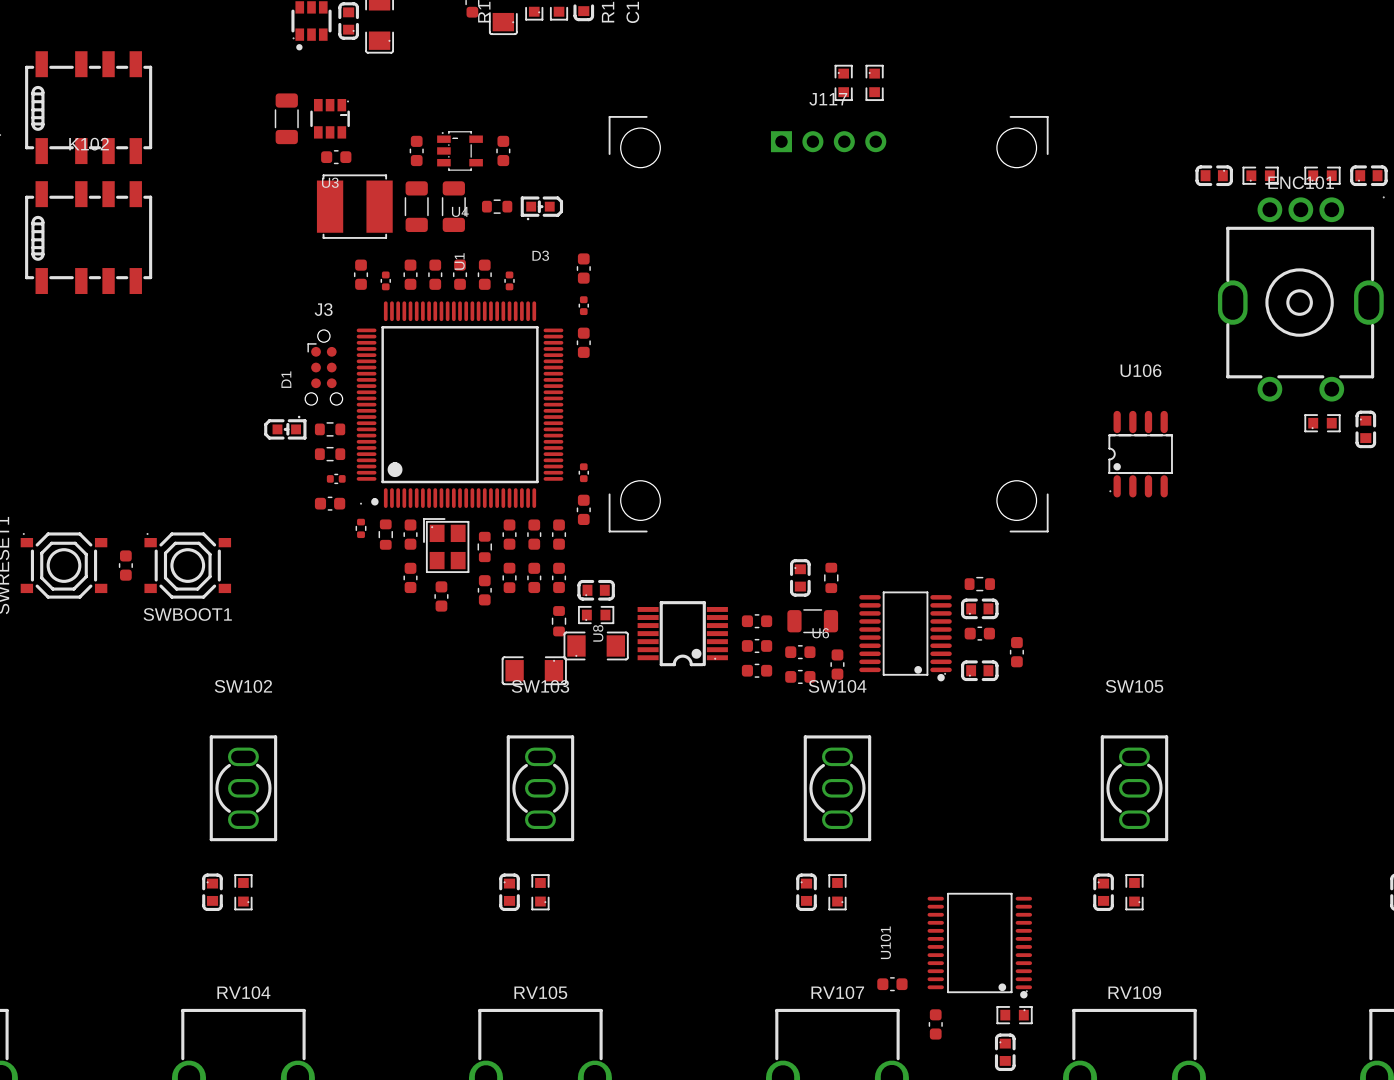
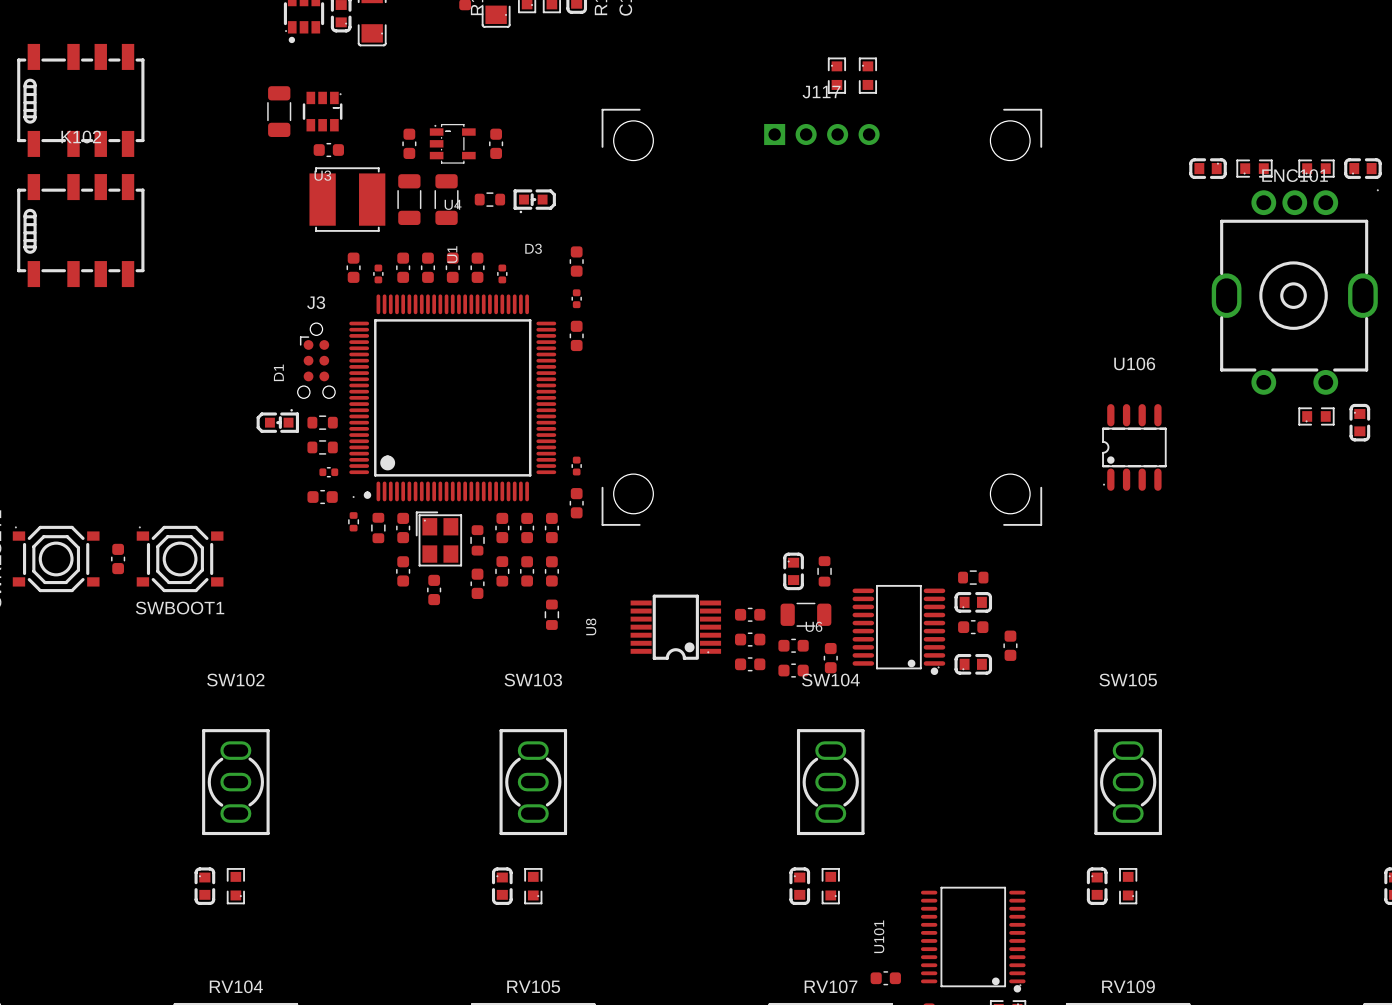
part: (596, 590) -> none
part: (596, 615) -> none
part: (596, 645) -> none
part: (534, 670) -> none

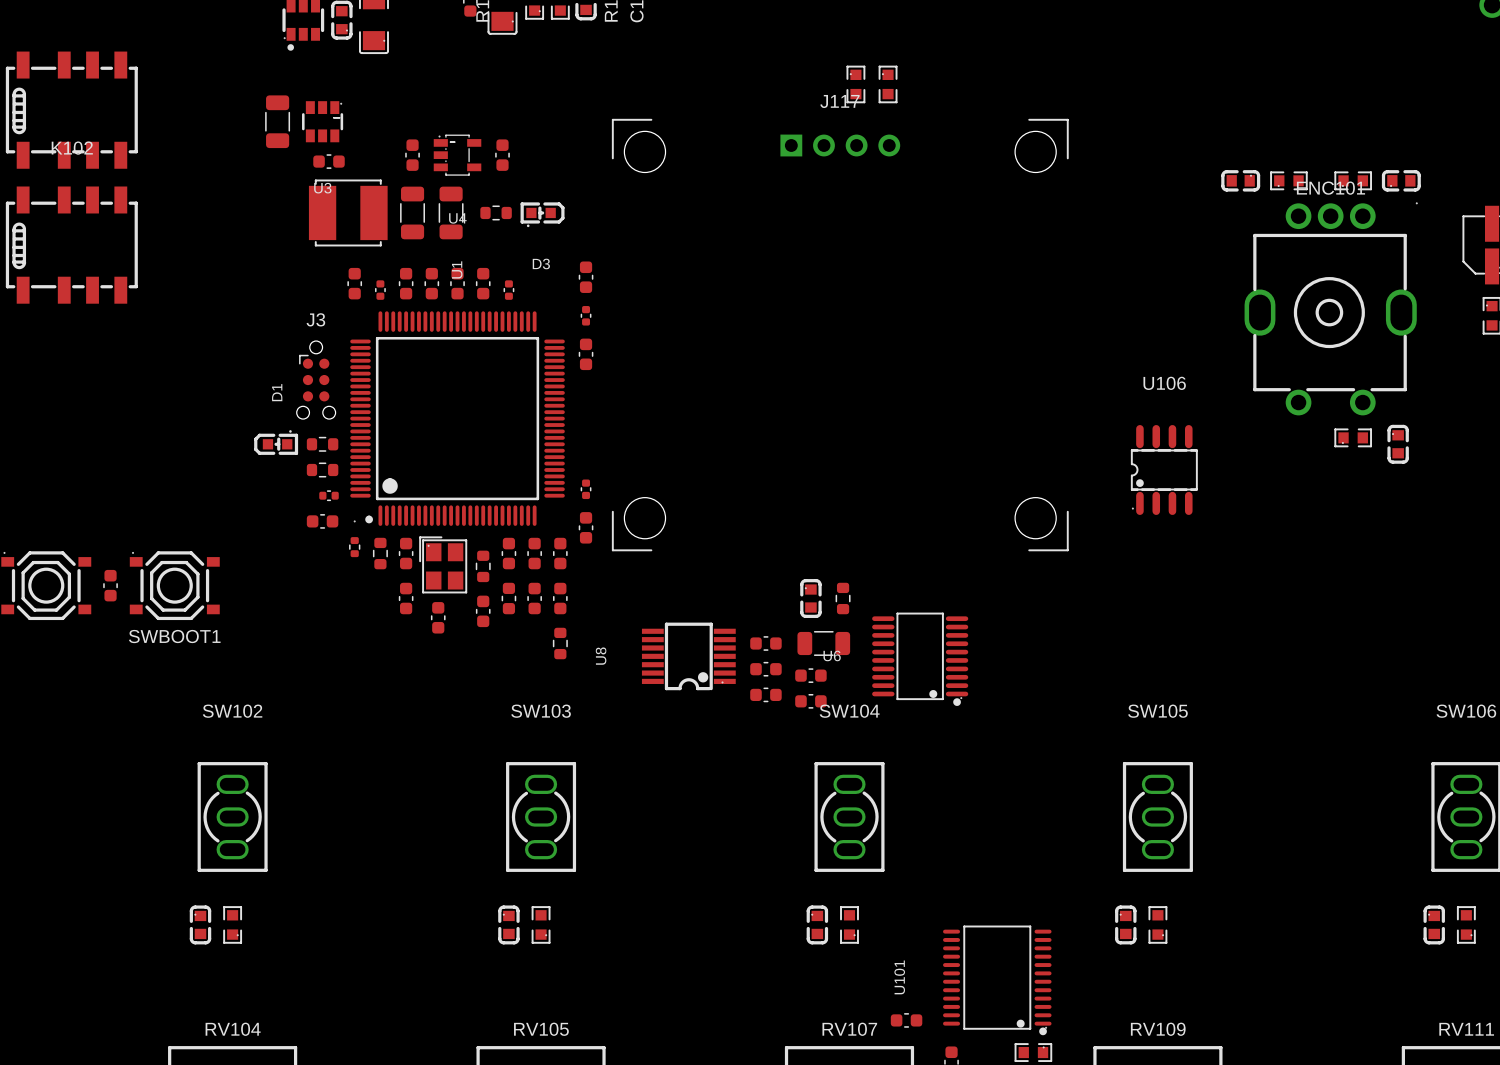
part: (973, 577) -> none
part: (973, 602) -> none
part: (973, 627) -> none
part: (1010, 645) -> none
part: (830, 658) -> none
part: (973, 664) -> none

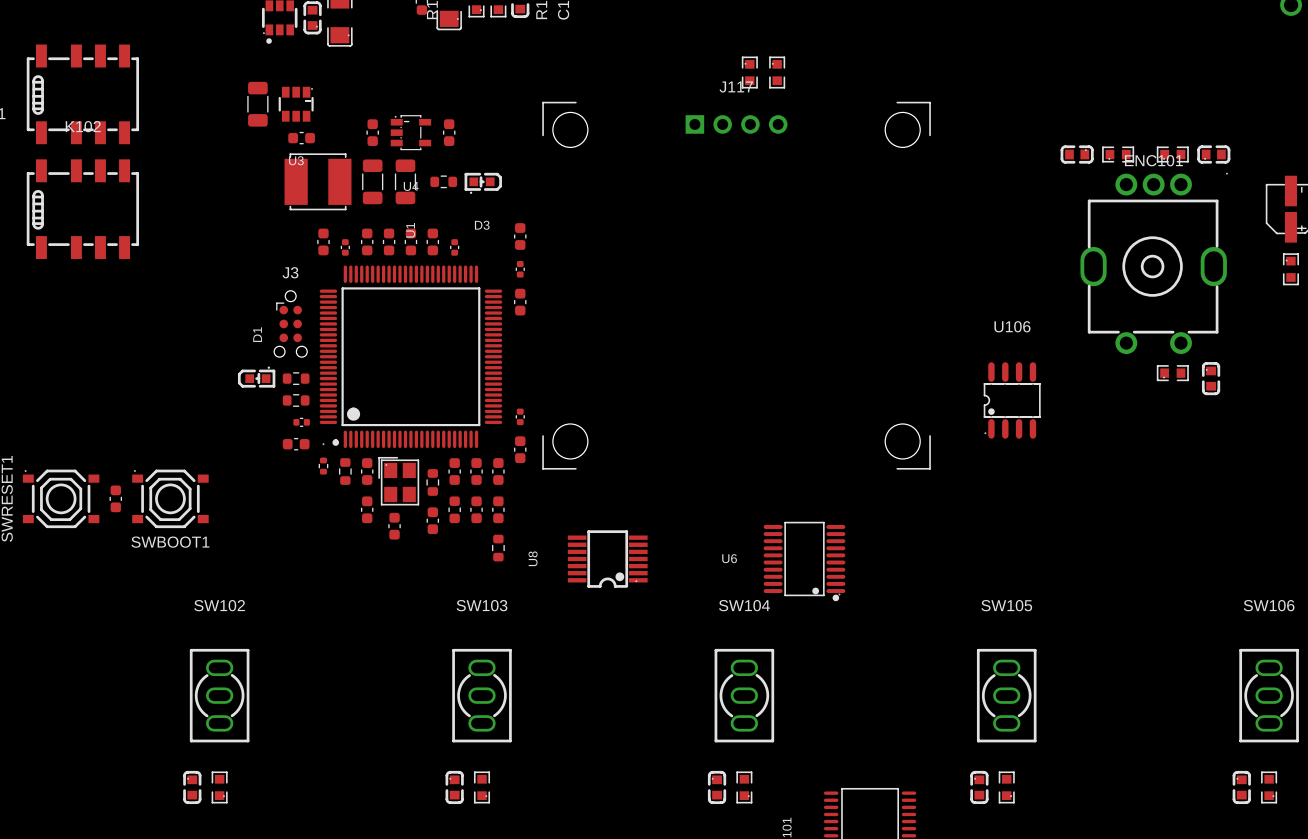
part: (810, 598) -> none
part: (843, 598) -> none
part: (765, 643) -> none
part: (823, 643) -> none
part: (765, 669) -> none
part: (810, 675) -> none
part: (765, 694) -> none
part: (810, 701) -> none

